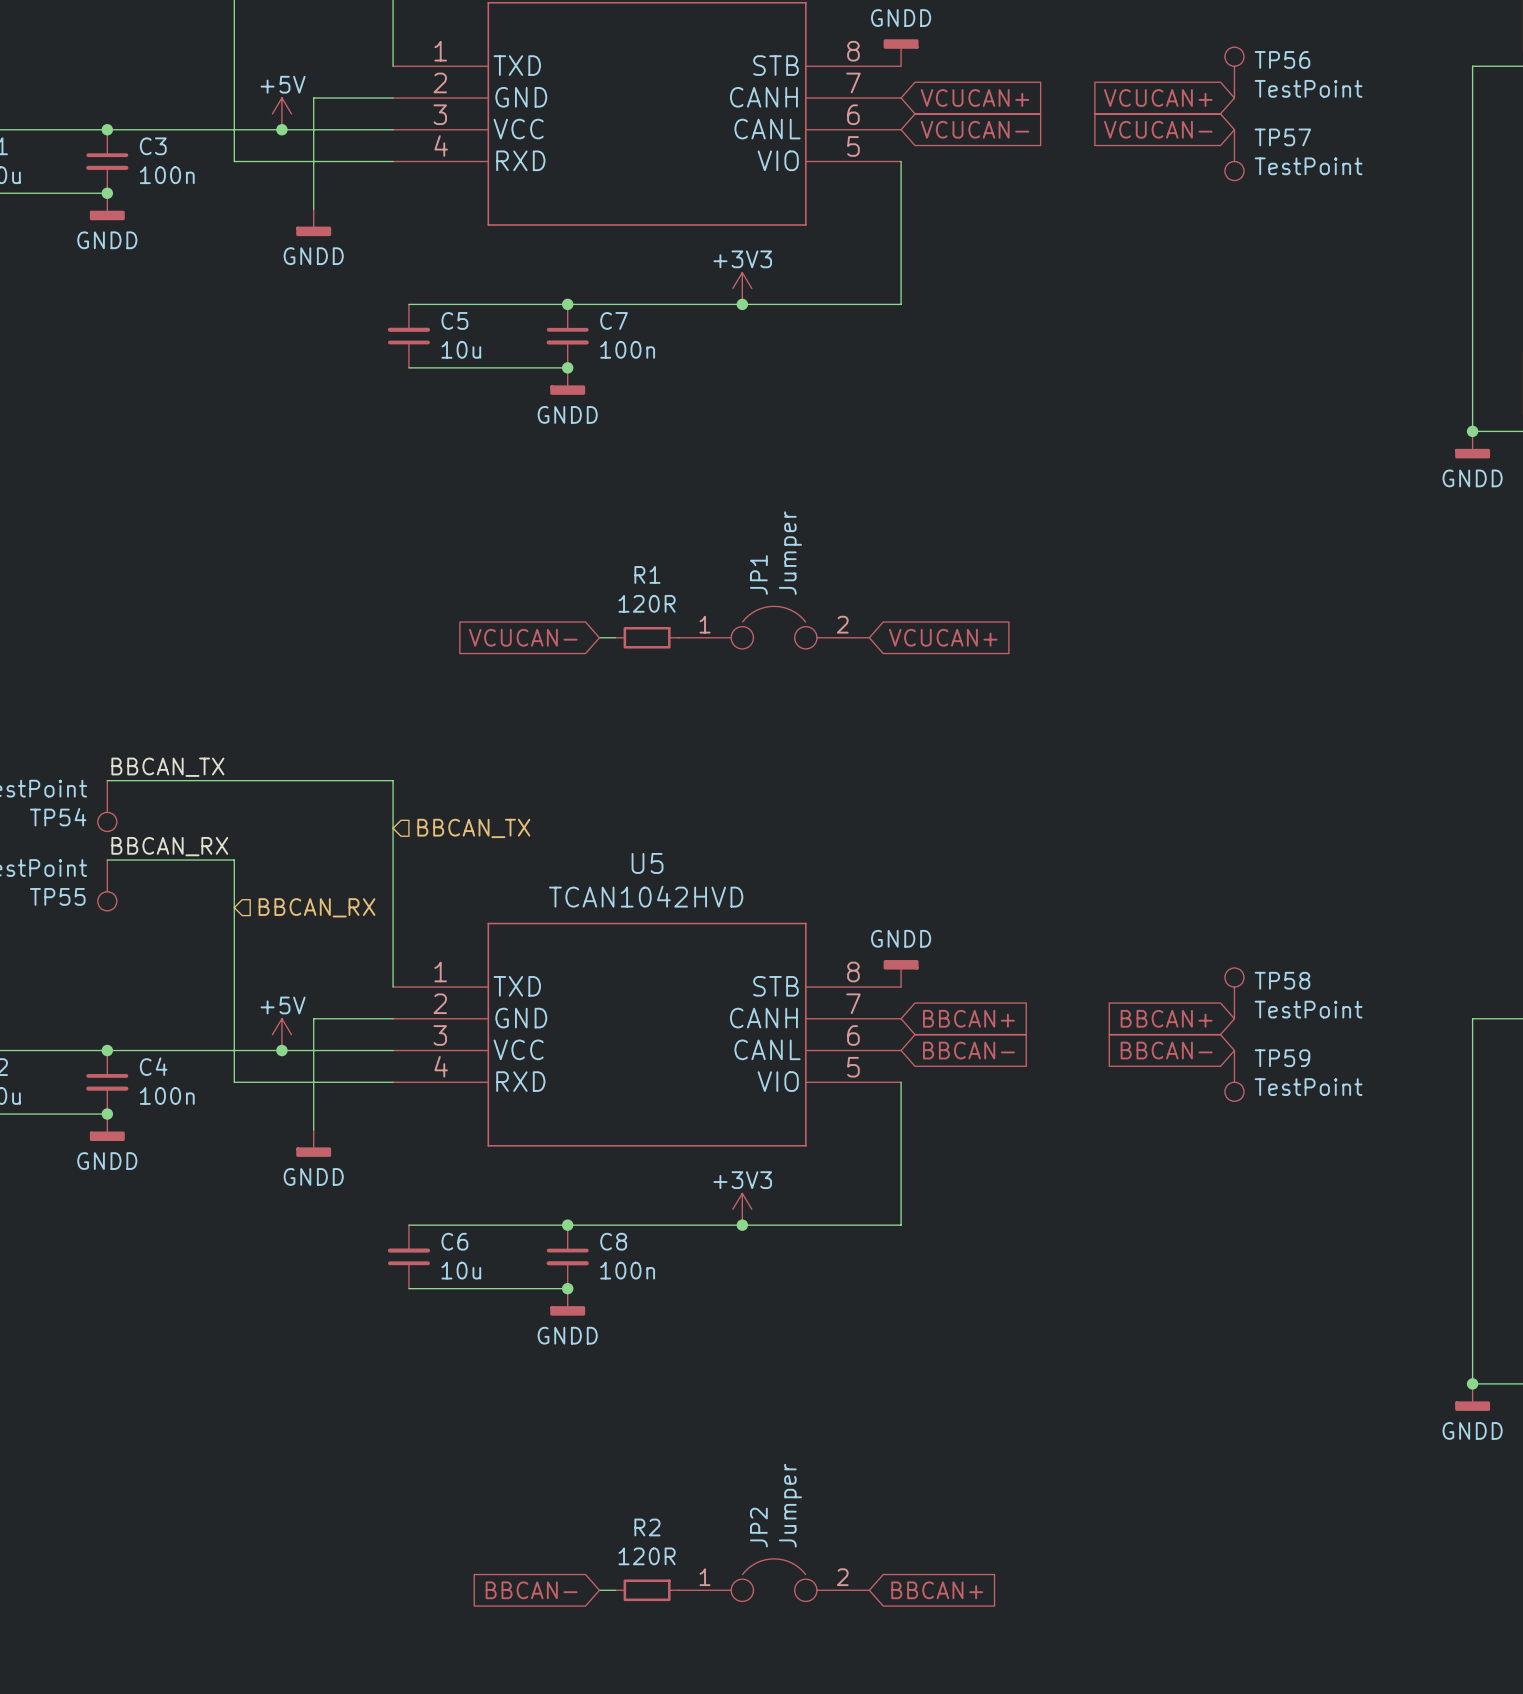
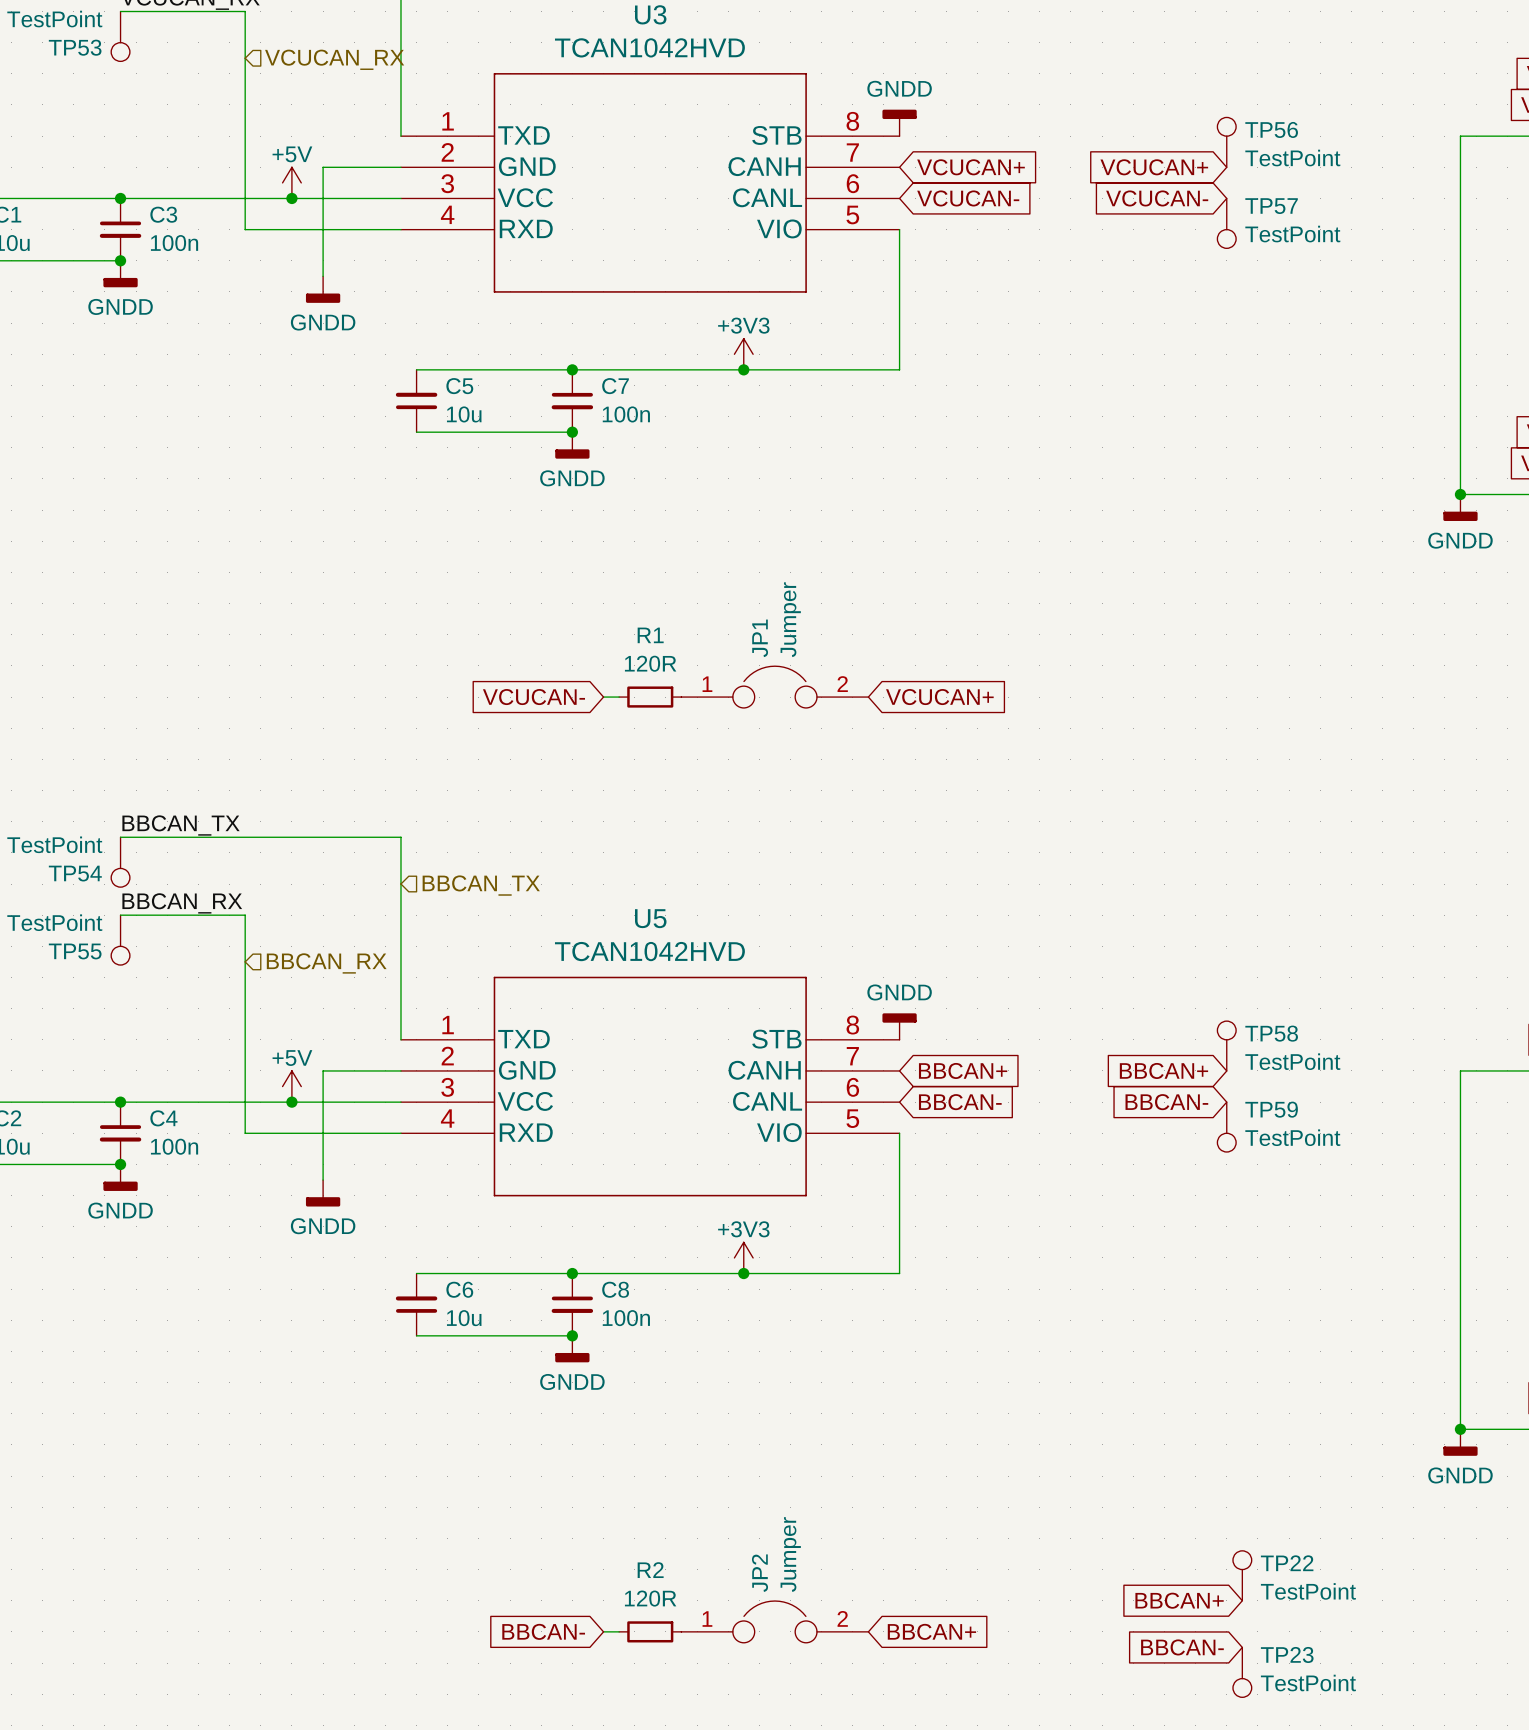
TP22: none -> TestPoint (1242, 1575)
global label: none -> BBCAN+ (1179, 1600)
global label: none -> BBCAN- (1182, 1647)
TP23: none -> TestPoint (1242, 1672)

